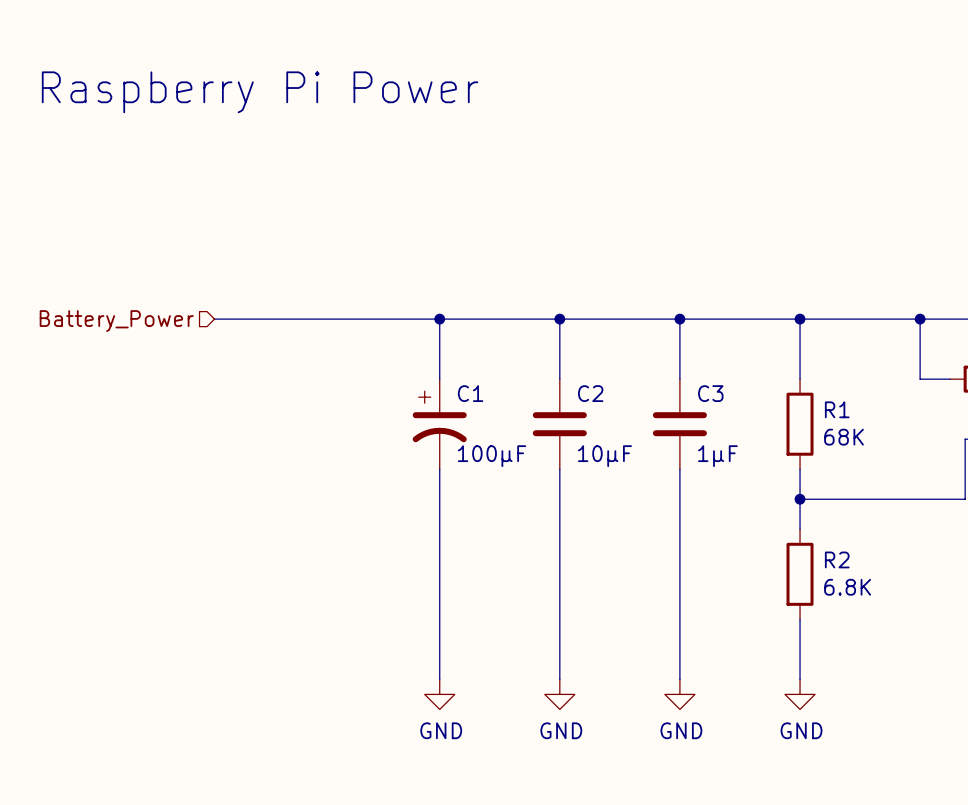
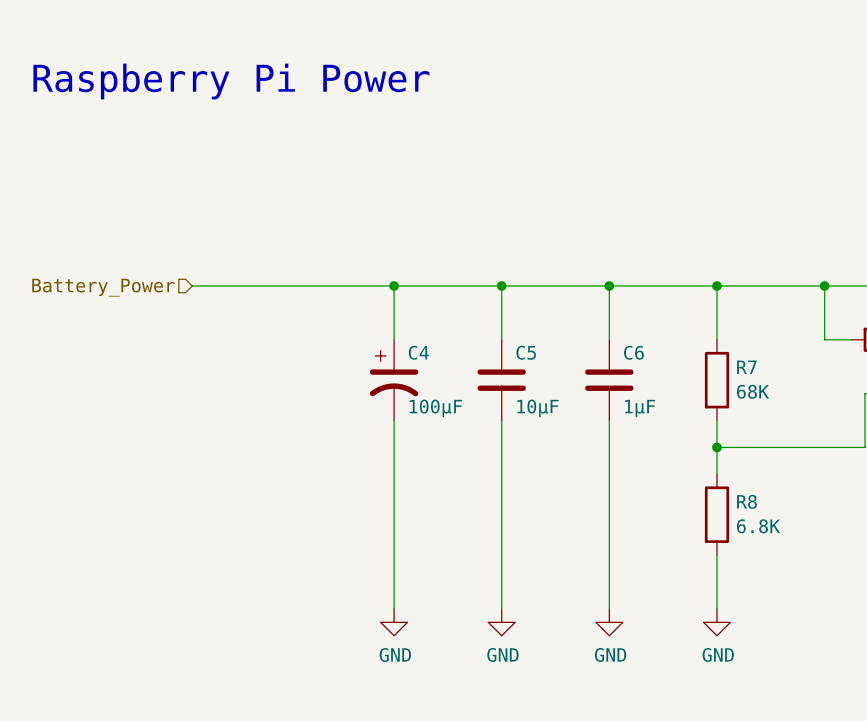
C1 name: C1 (470, 393) -> C4 (418, 352)
C2 name: C2 (590, 393) -> C5 (526, 352)
C3 name: C3 (710, 393) -> C6 (633, 352)
R1 name: R1 (837, 409) -> R7 (746, 367)
R2 name: R2 (837, 559) -> R8 (746, 501)

